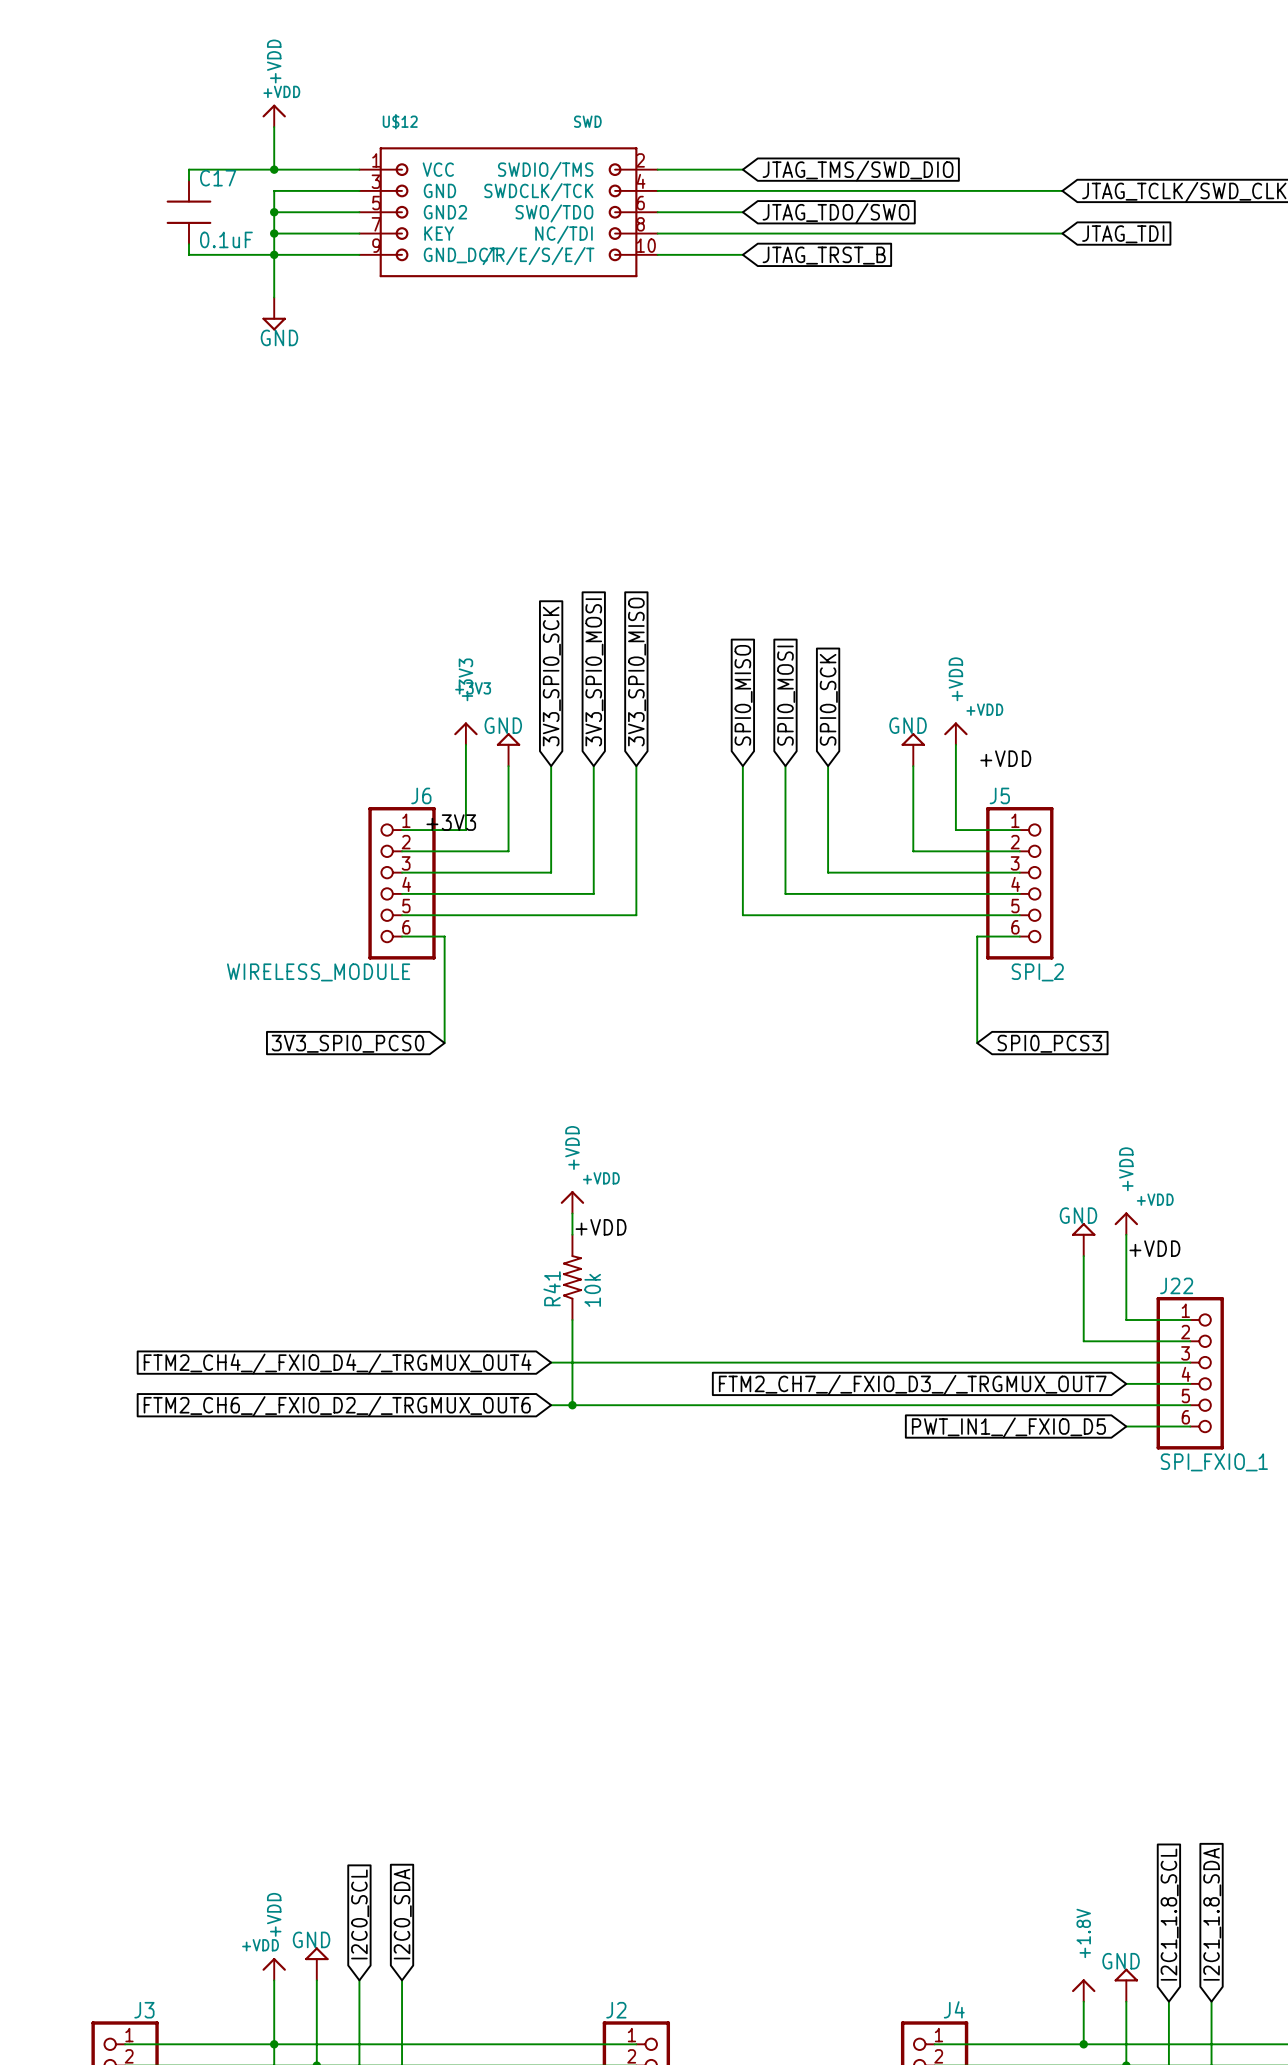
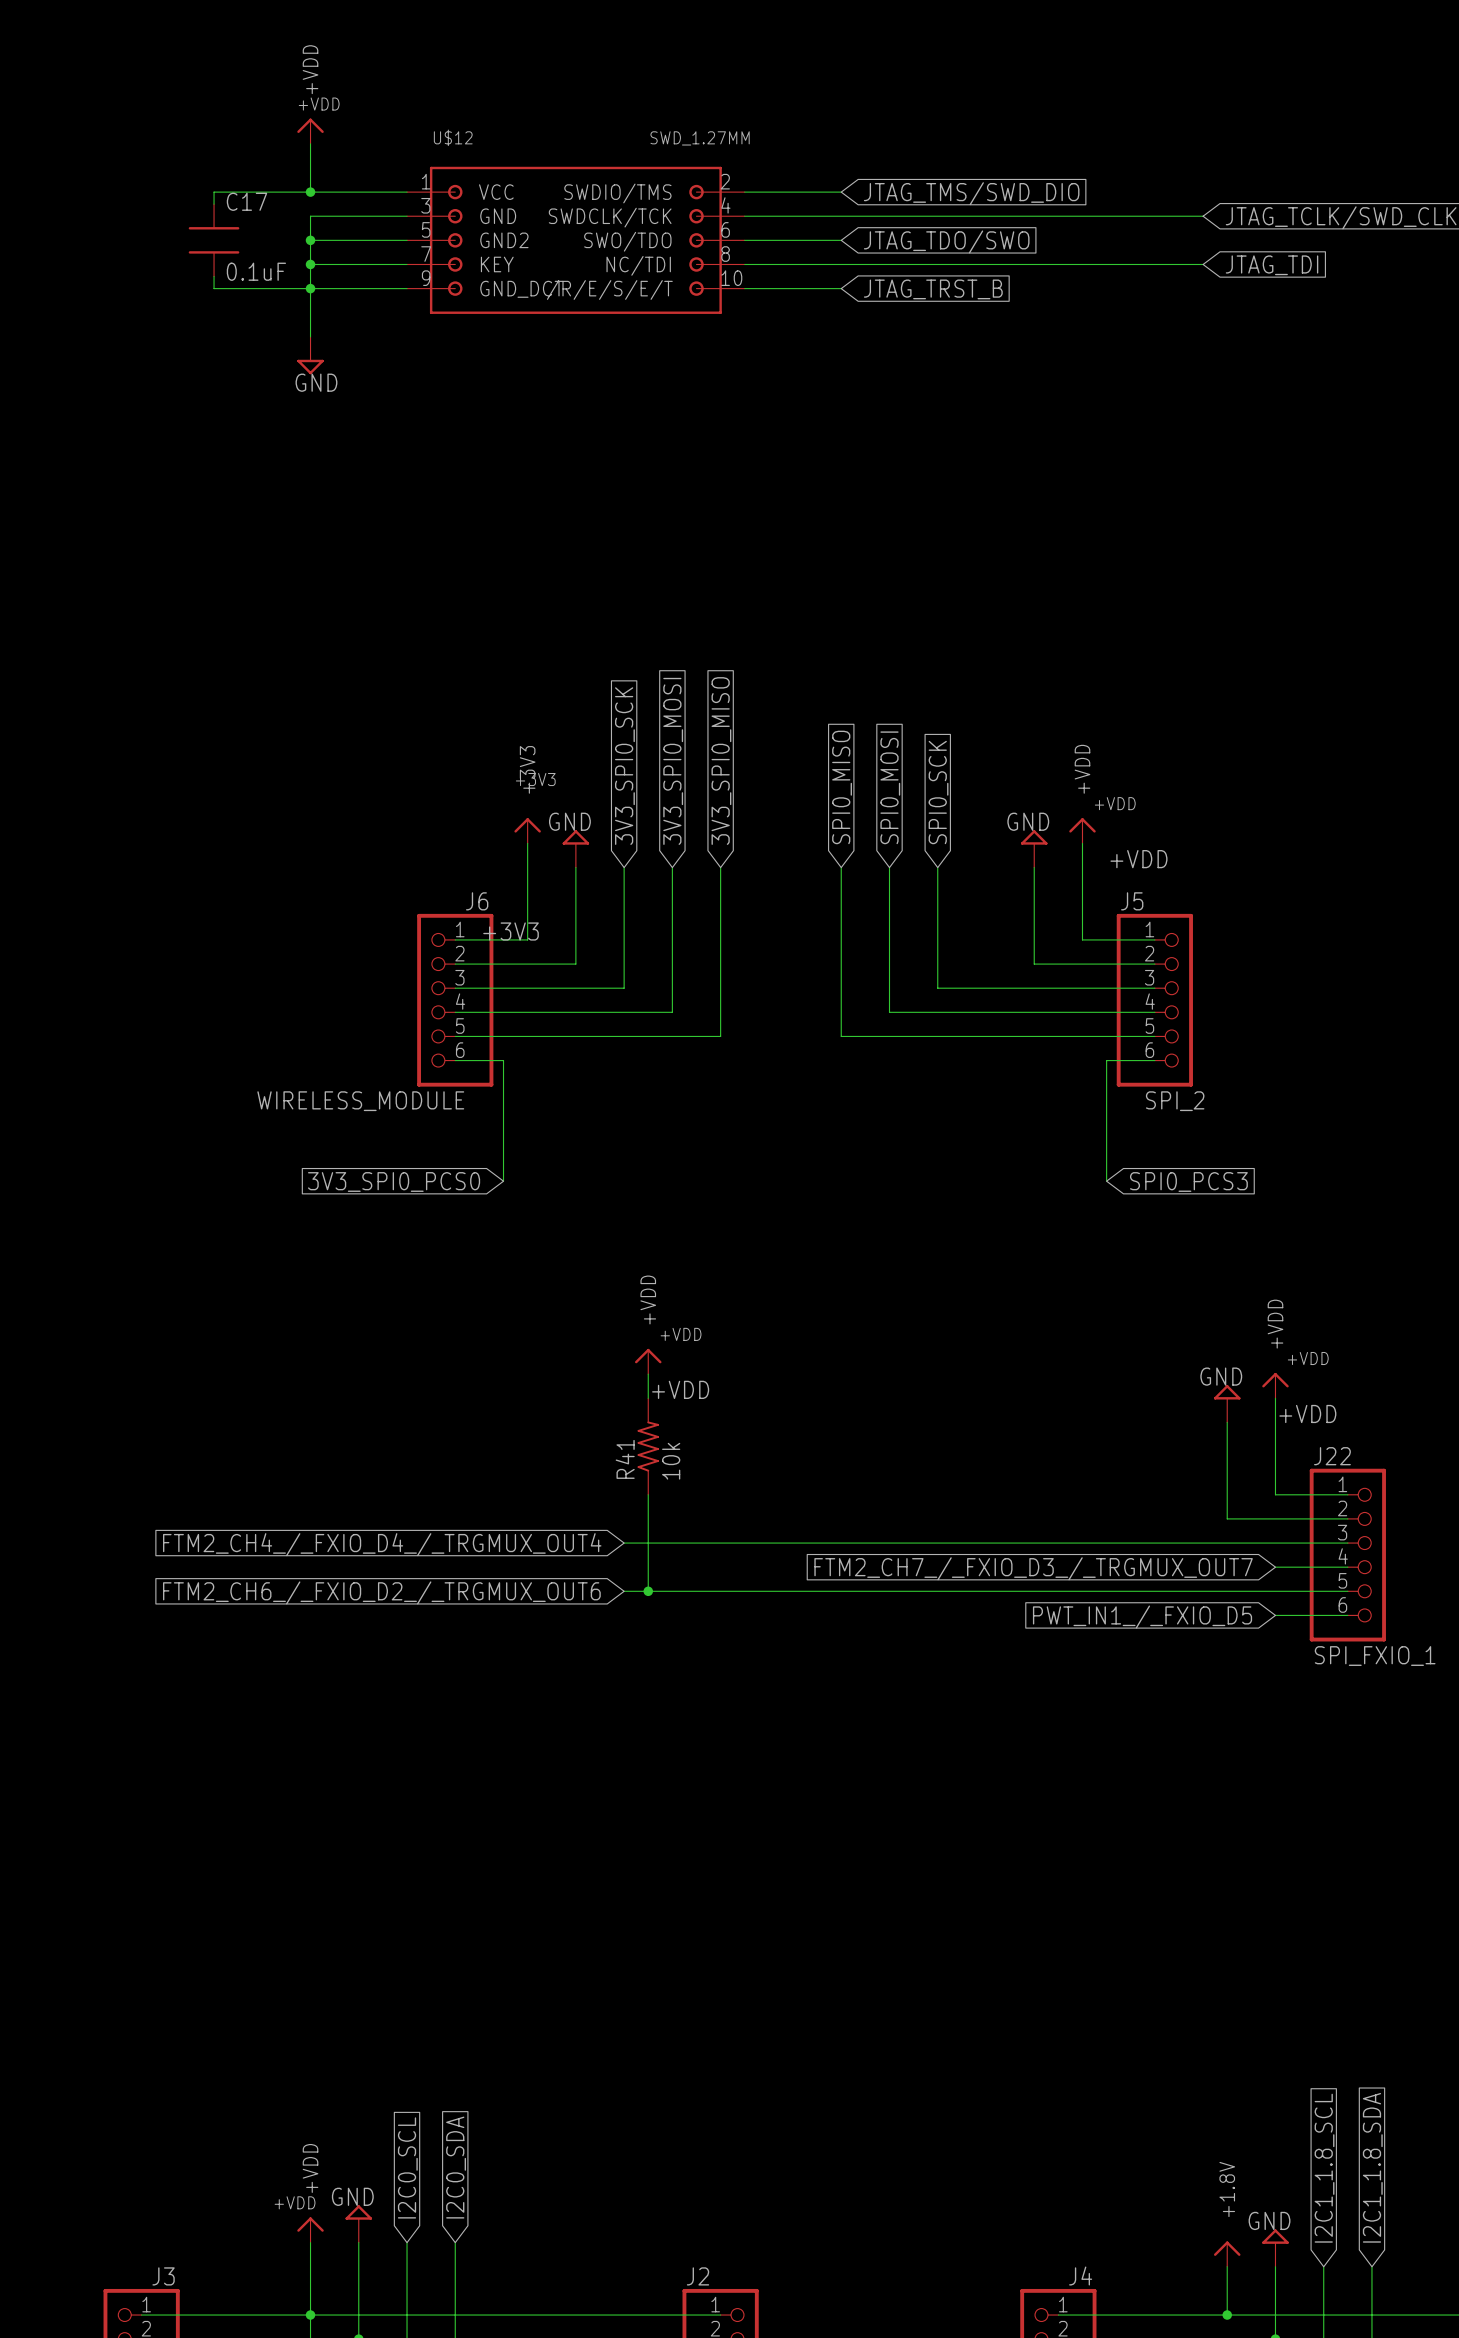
U$12 value: SWD (587, 121) -> SWD_1.27MM (700, 138)

